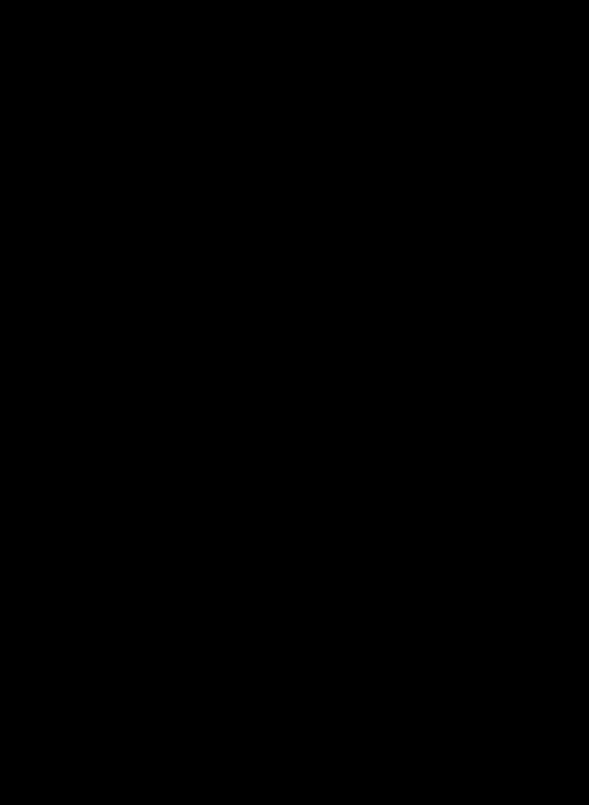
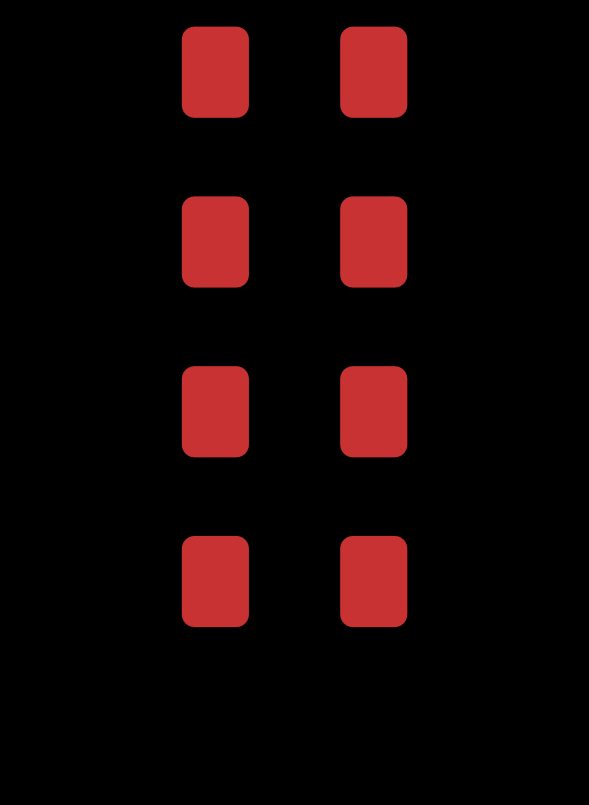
part: none -> (294, 72)
part: none -> (294, 241)
part: none -> (294, 411)
part: none -> (294, 581)

